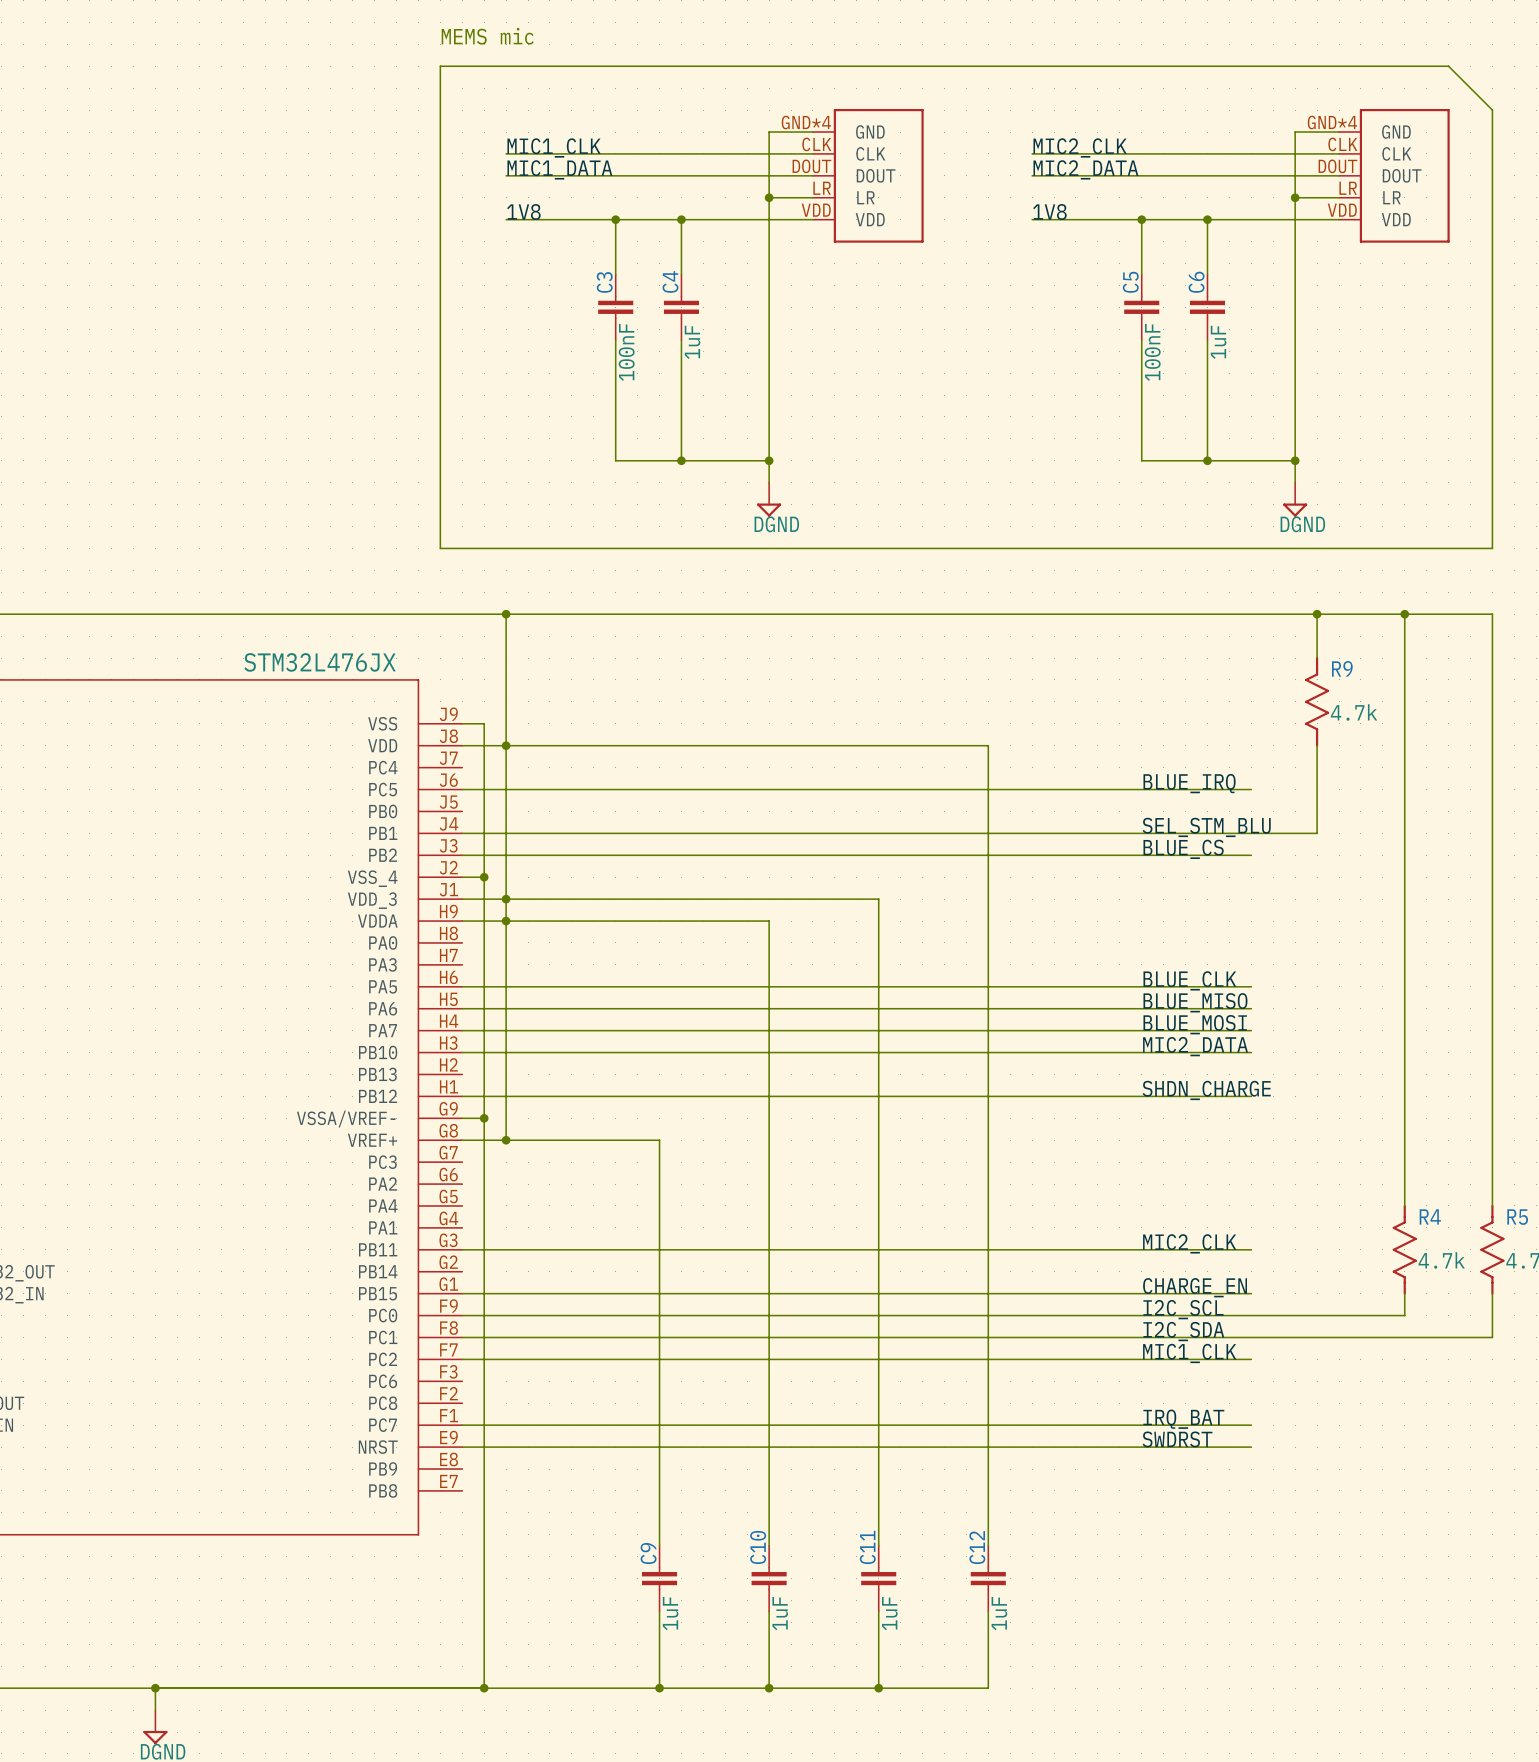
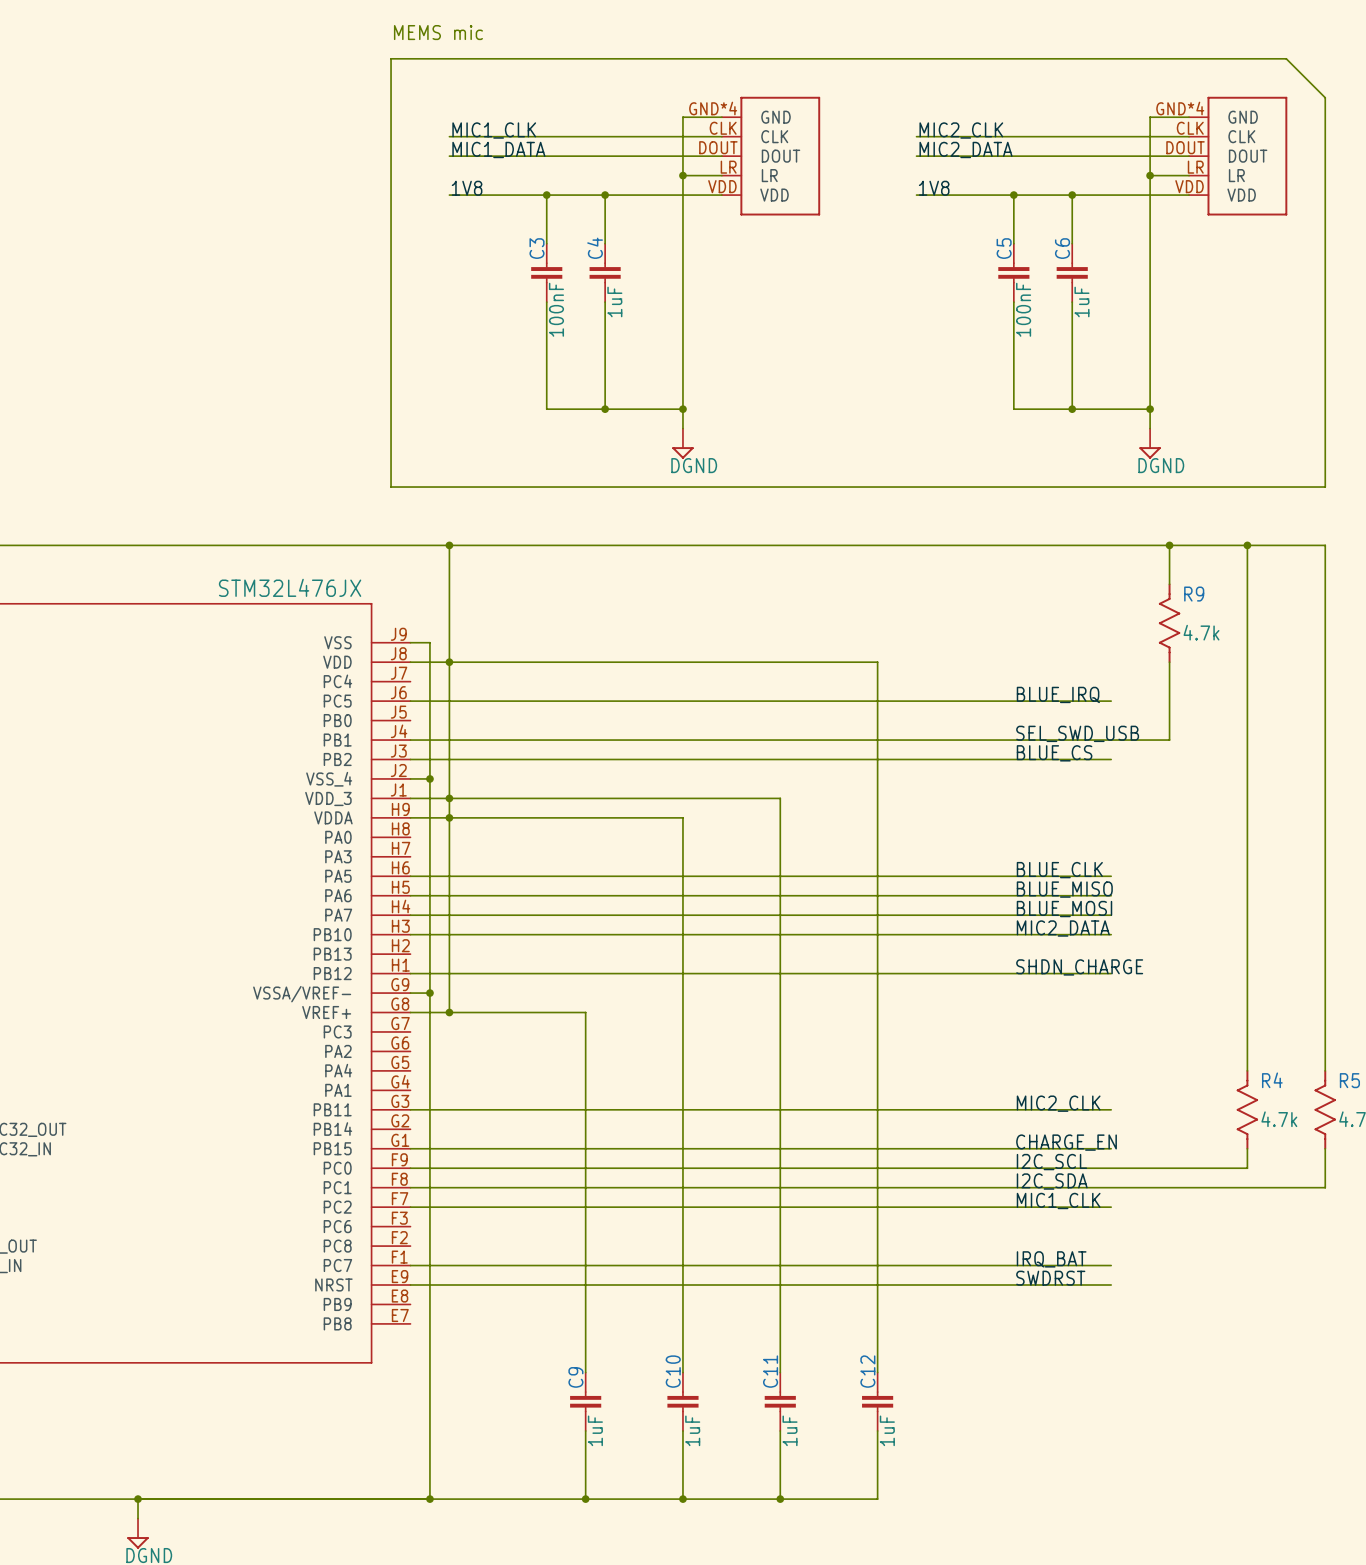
label: SEL_STM_BLU (1206, 827) -> SEL_SWD_USB (1077, 733)

